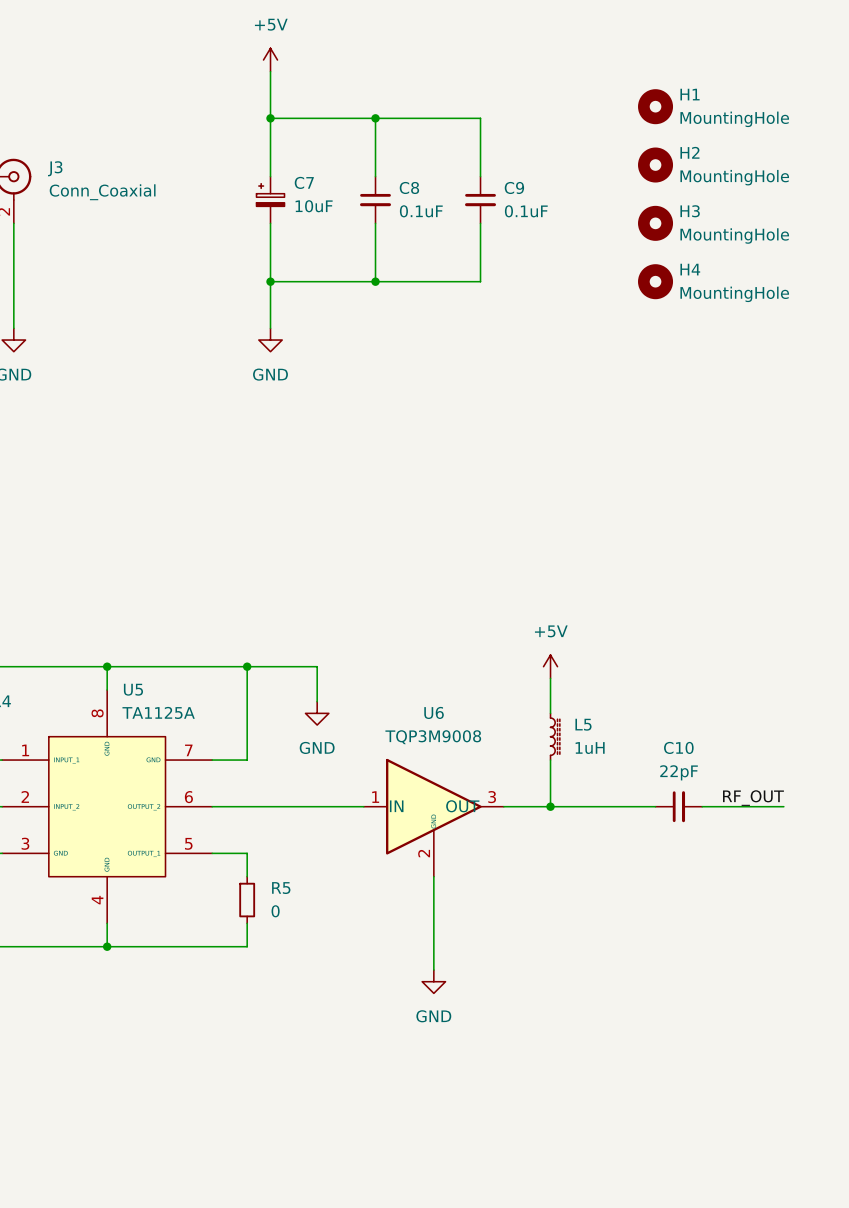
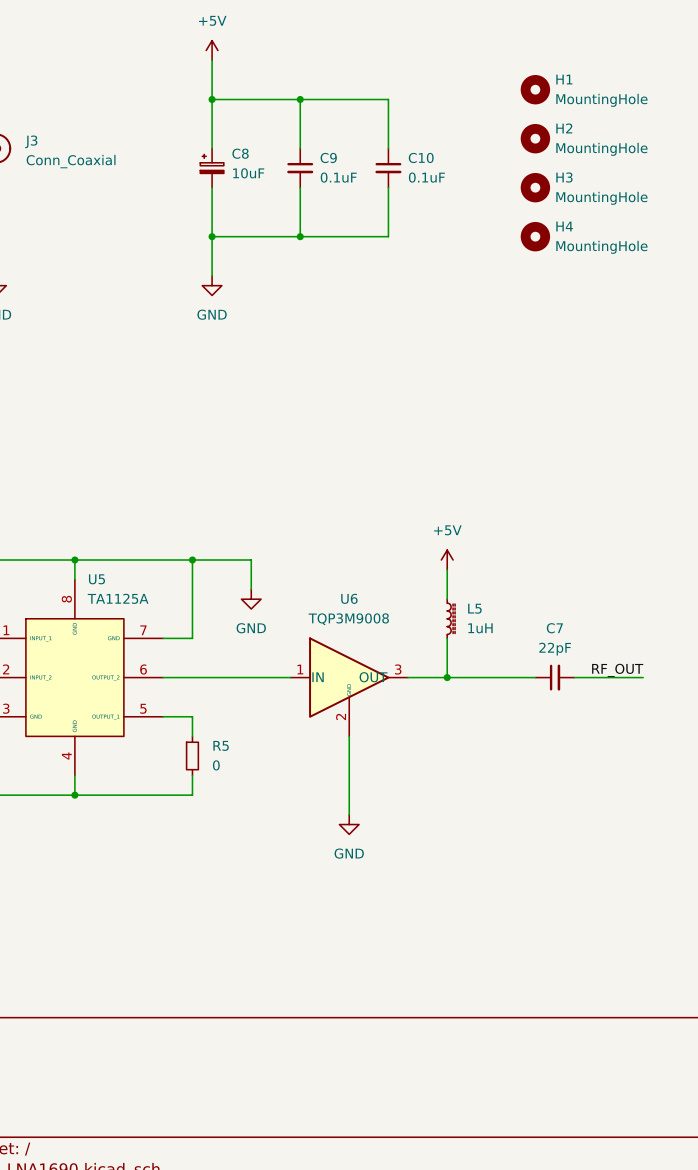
C7 name: C7 (304, 182) -> C8 (240, 153)
C8 name: C8 (409, 187) -> C9 (328, 157)
C9 name: C9 (514, 187) -> C10 (421, 157)
C10 name: C10 (678, 747) -> C7 (554, 628)

